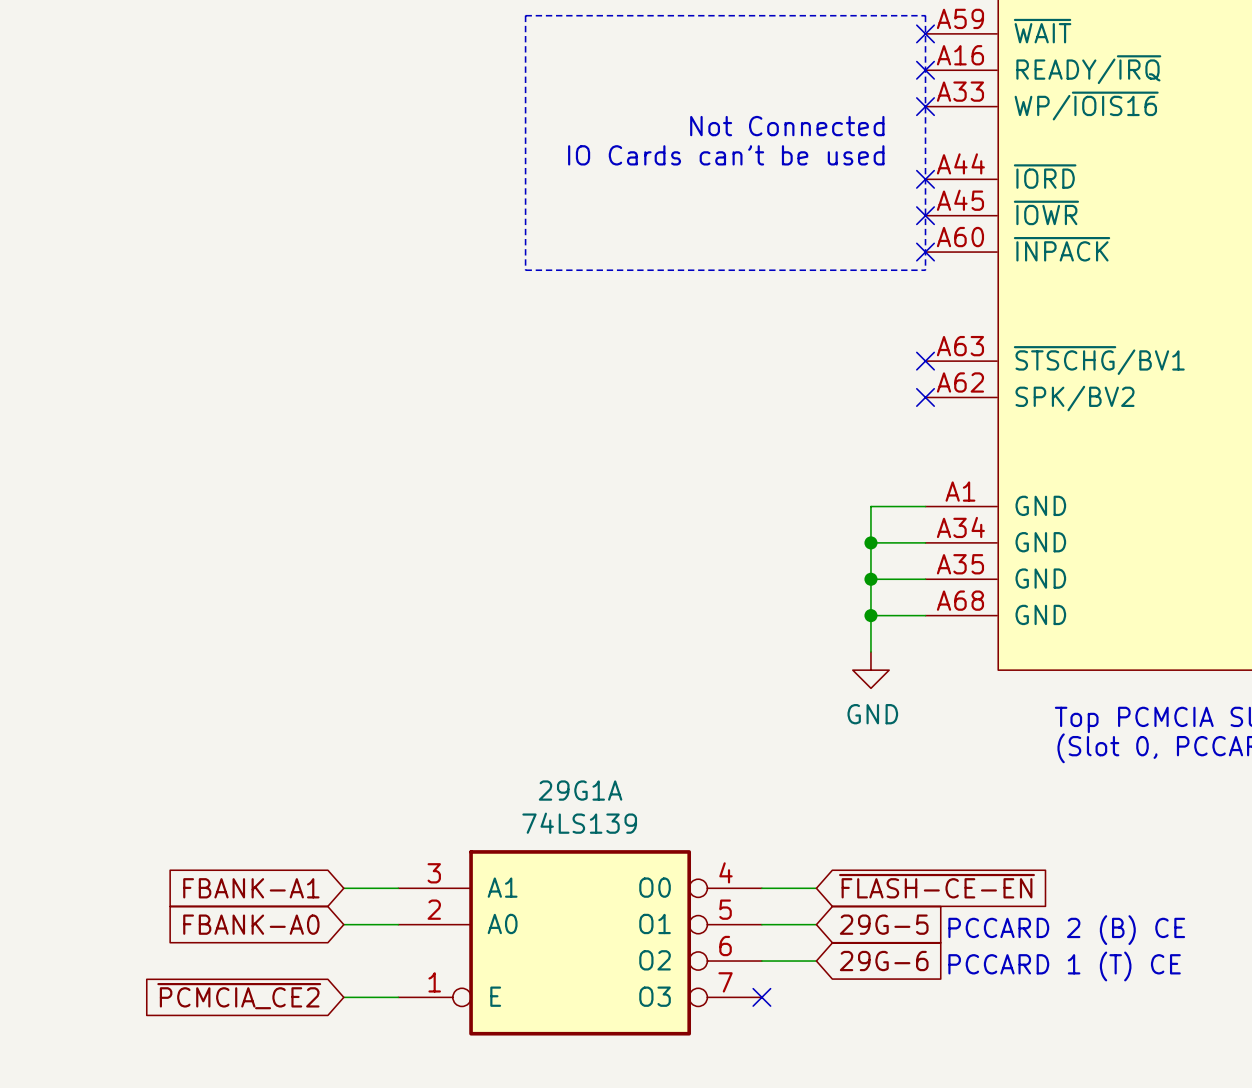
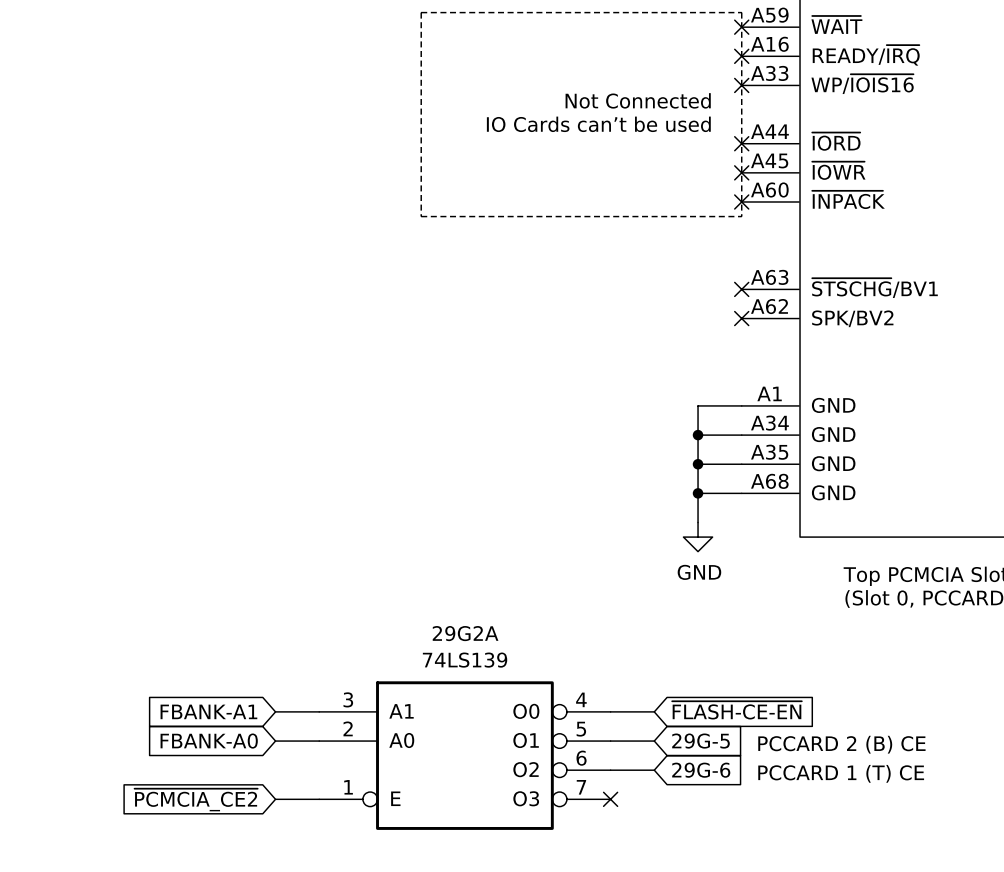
29G1A name: 29G1A (580, 790) -> 29G2A (465, 633)

